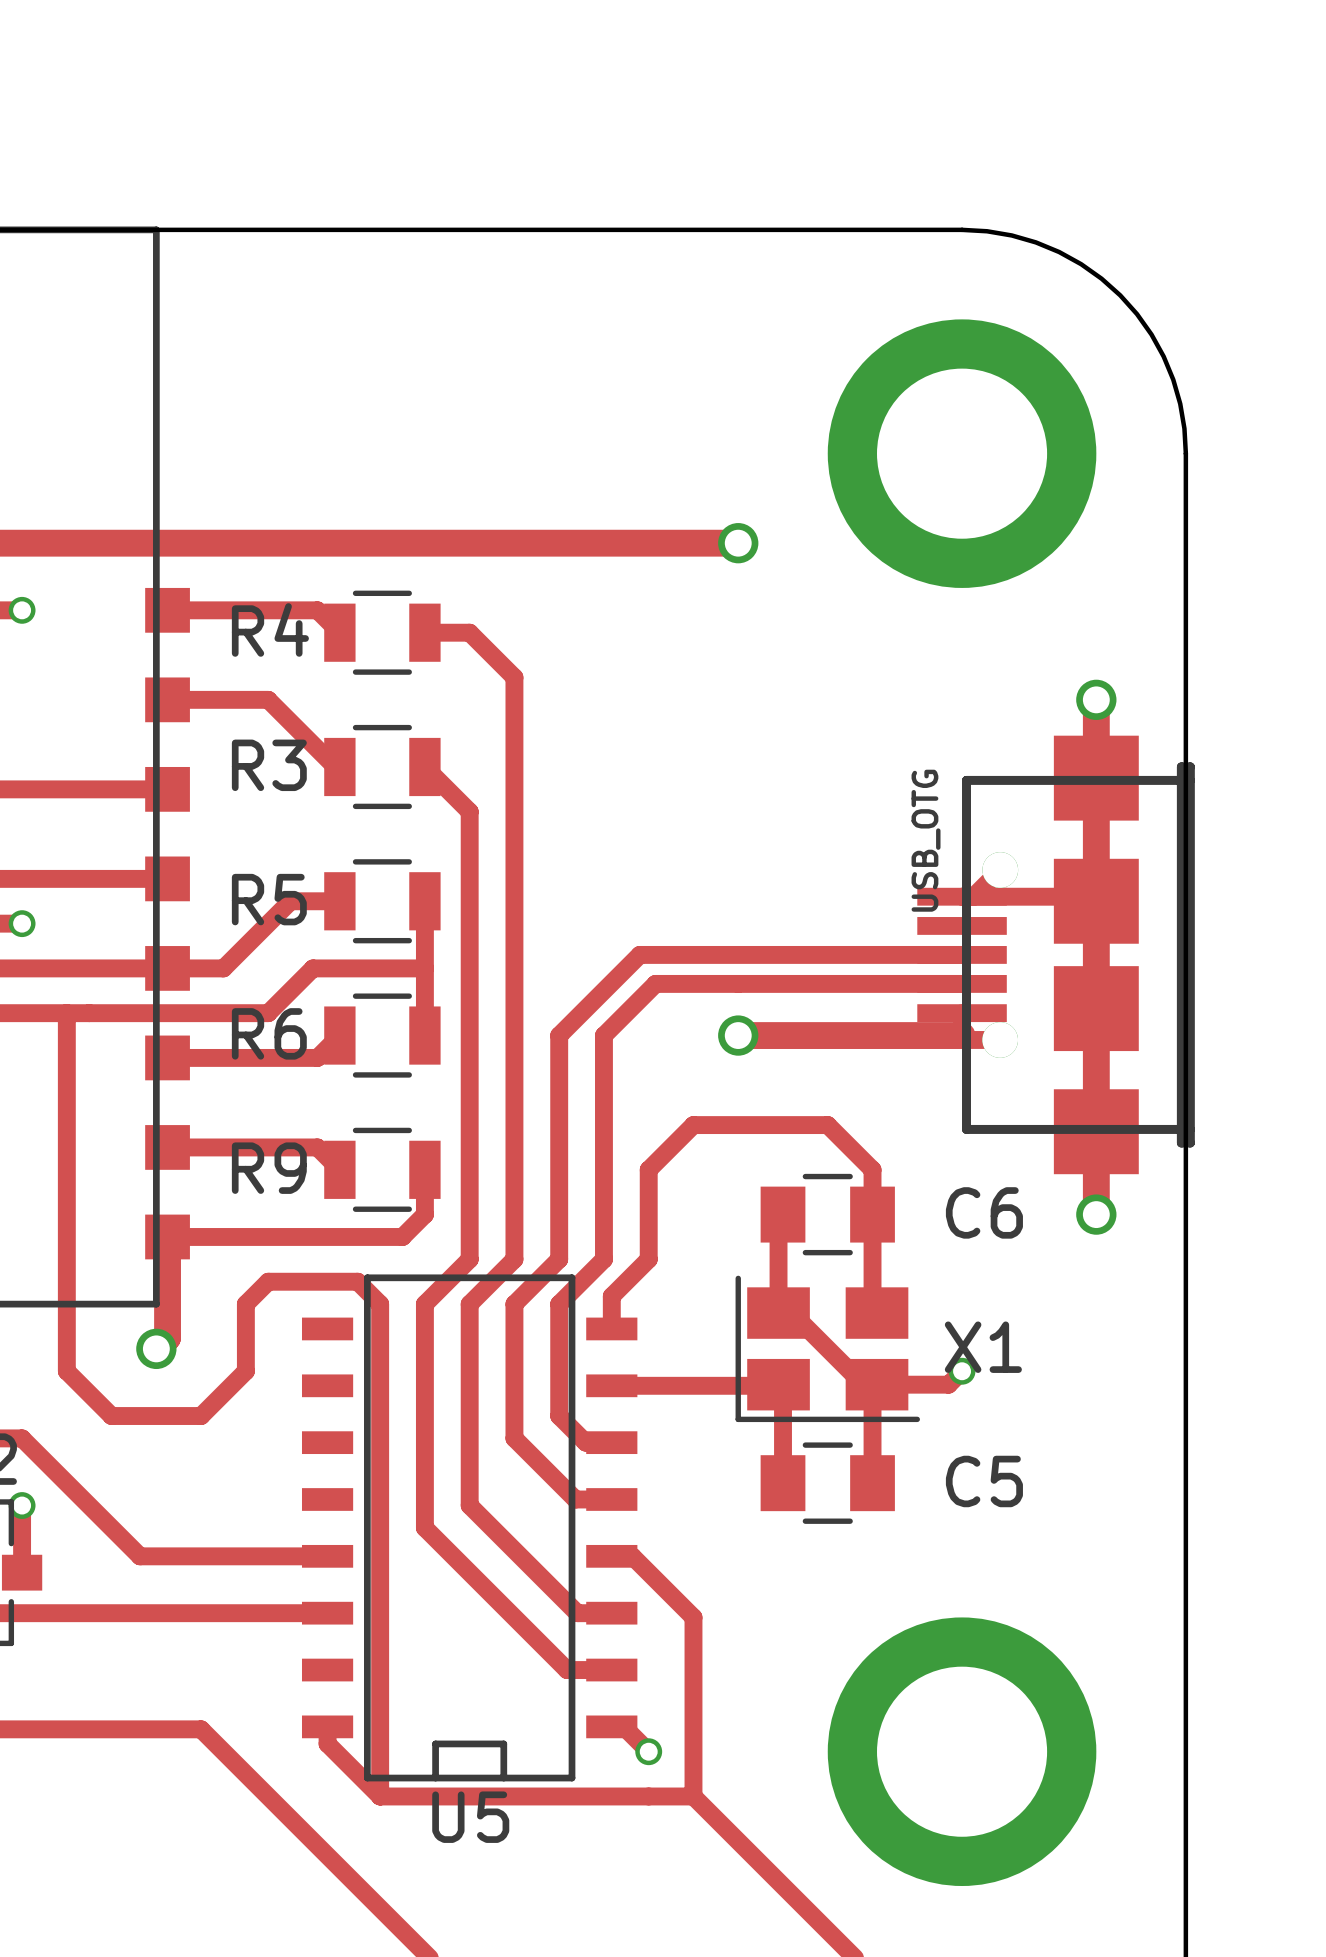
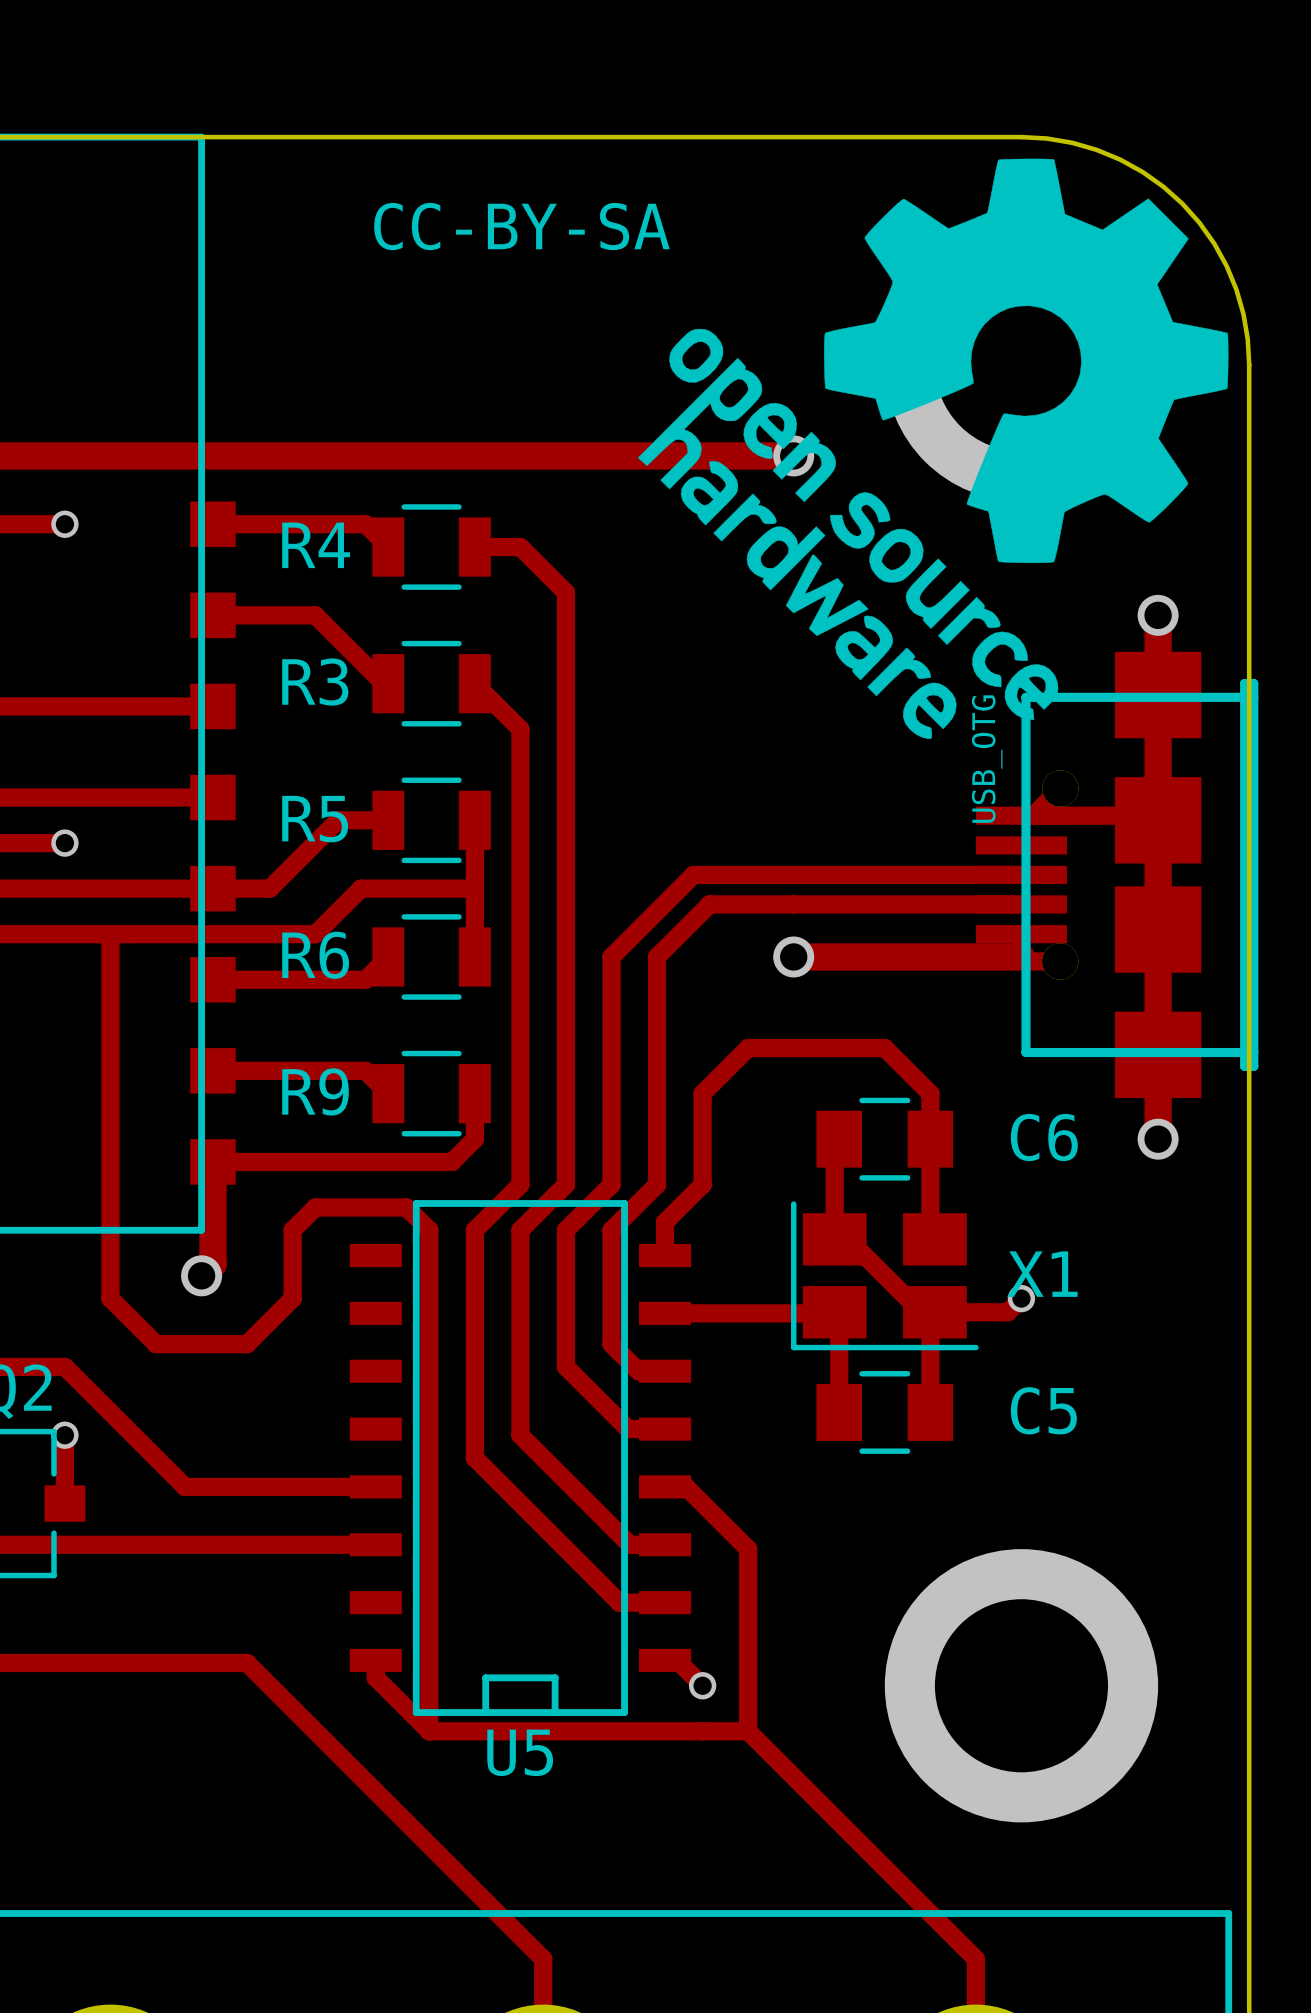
drawing: none -> [637, 158, 1229, 740]
text: none -> CC-BY-SA (521, 226)

